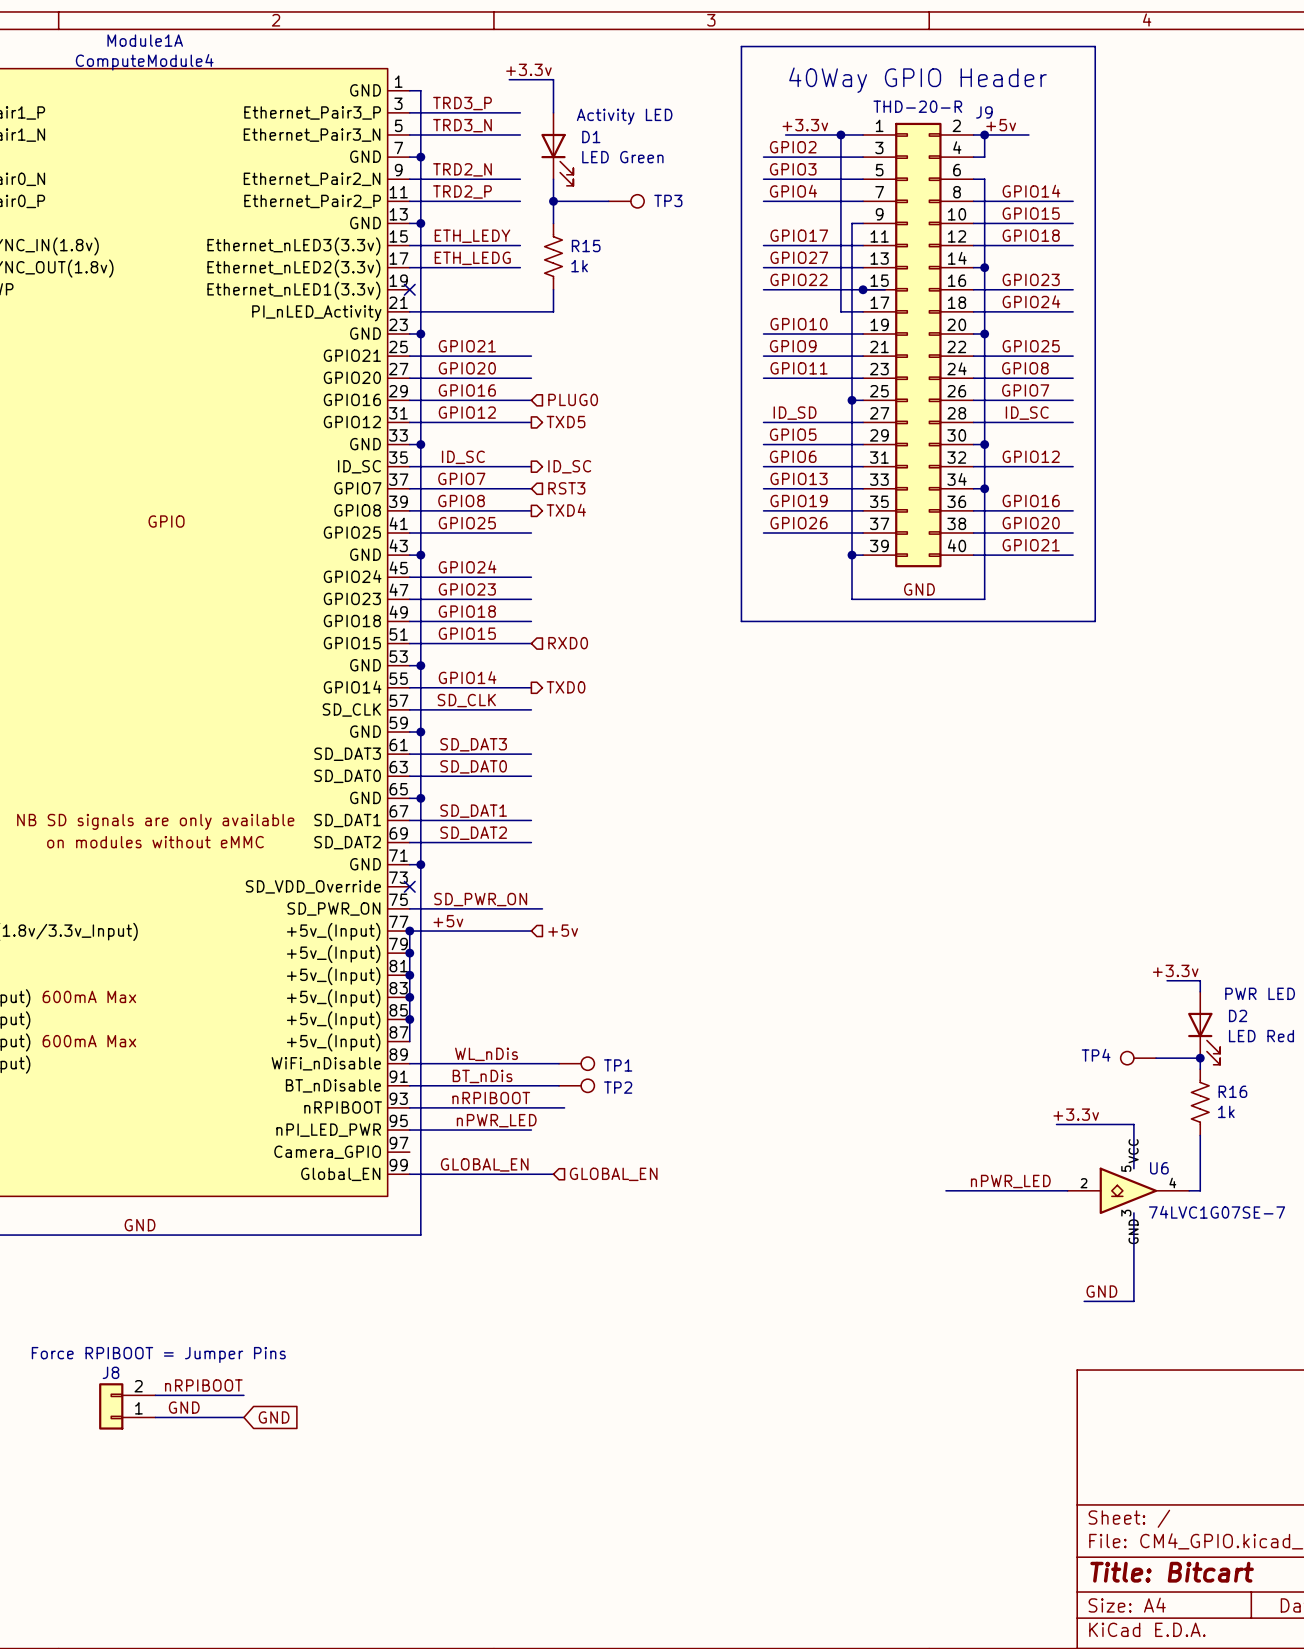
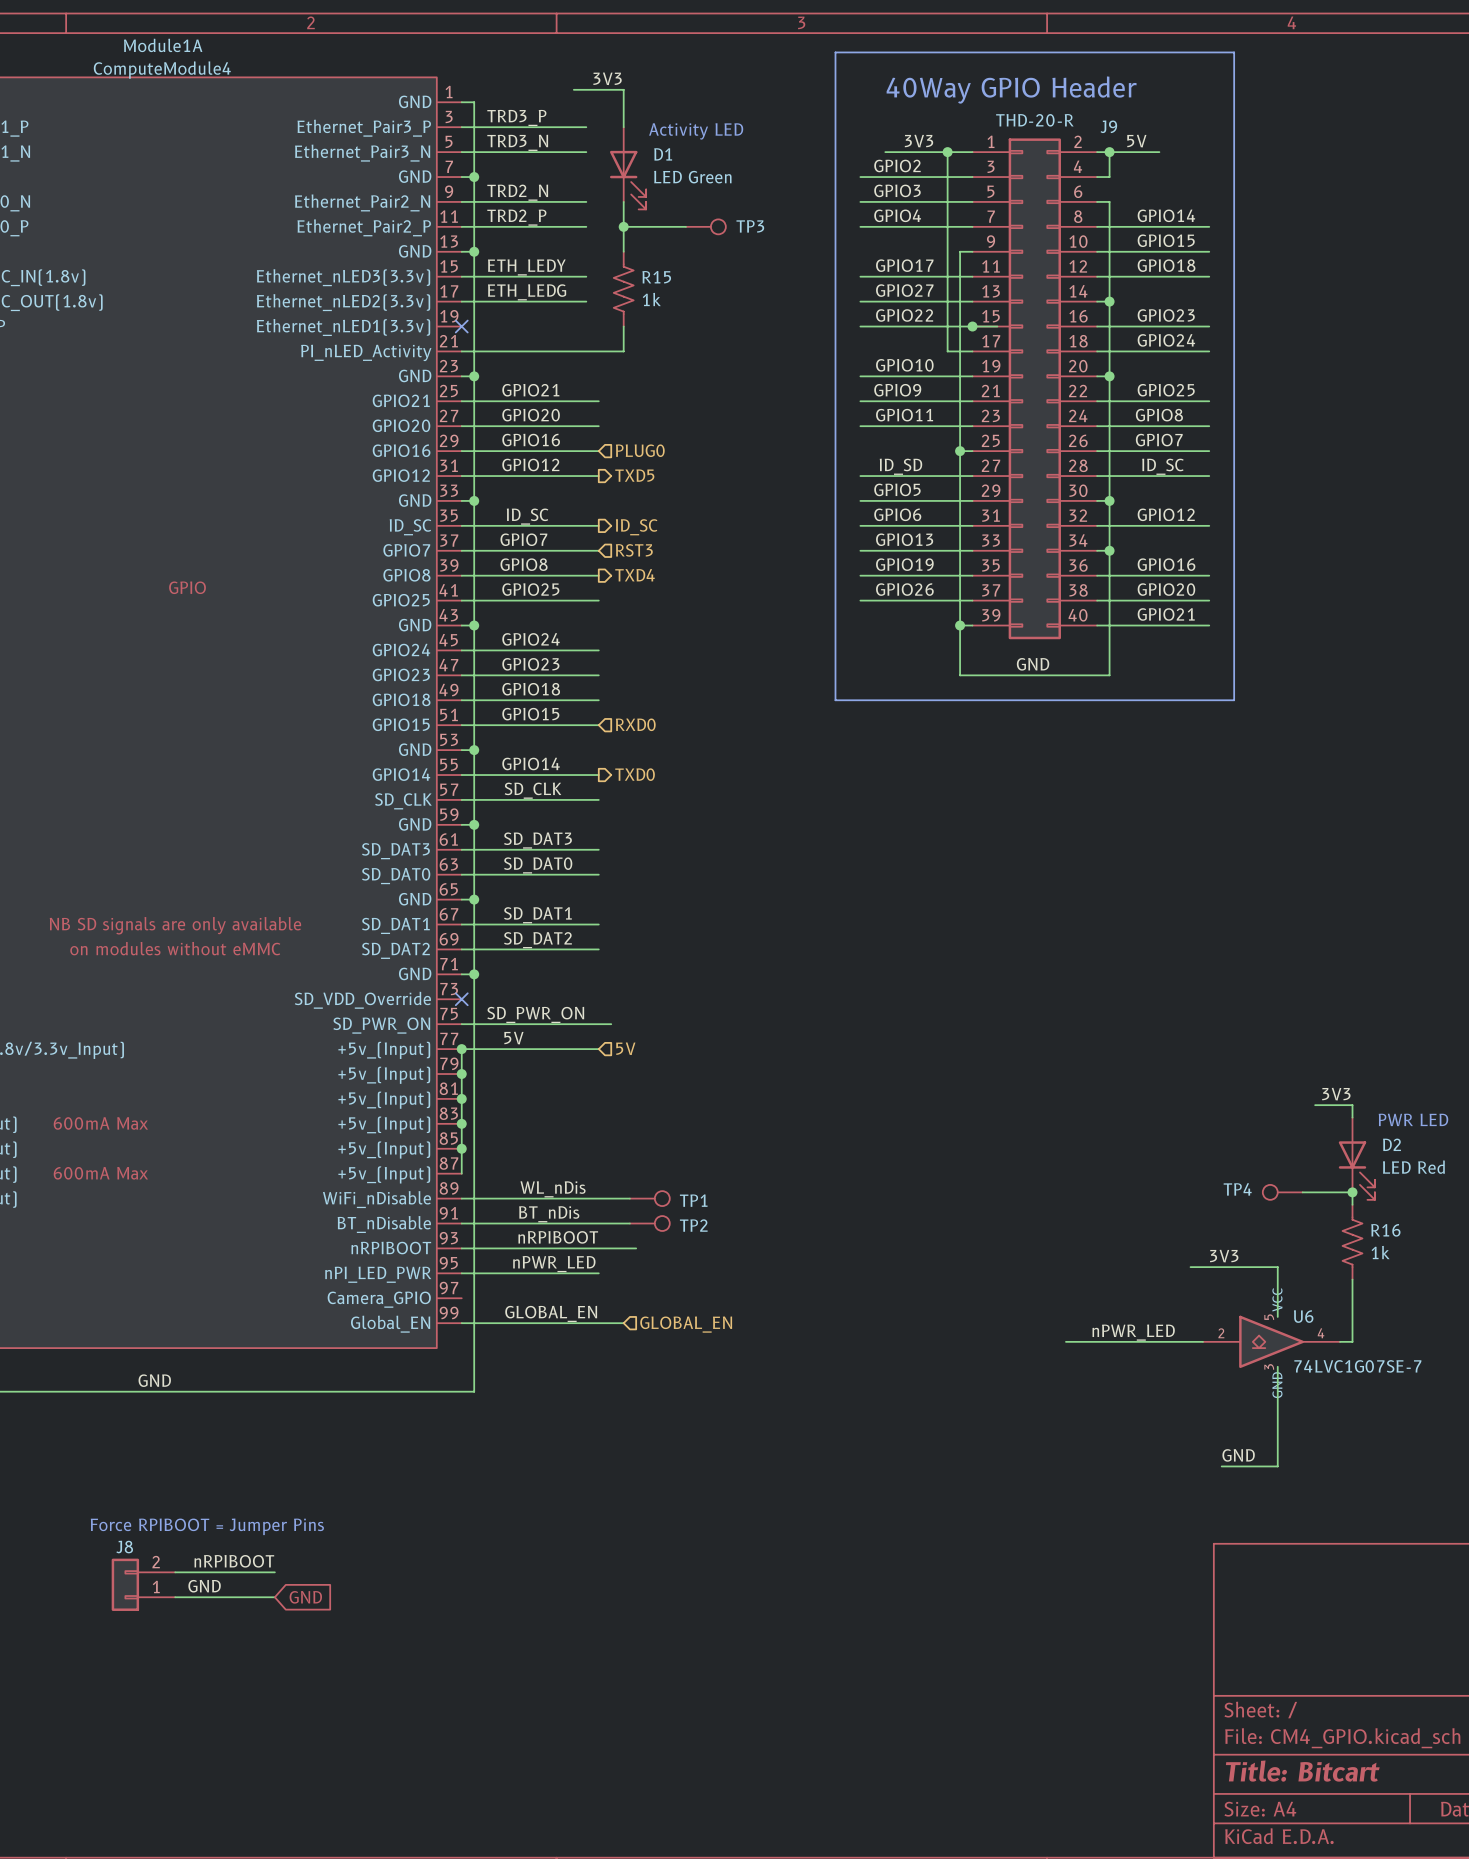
label: +3.3v (528, 69) -> 3V3 (607, 78)
label: +3.3v (805, 125) -> 3V3 (919, 141)
label: +5v (1001, 125) -> 5V (1136, 141)
label: +5v (448, 921) -> 5V (513, 1038)
hierarchical label: +5v (563, 930) -> 5V (625, 1048)
label: +3.3v (1175, 970) -> 3V3 (1336, 1094)
label: +3.3v (1076, 1114) -> 3V3 (1224, 1256)

